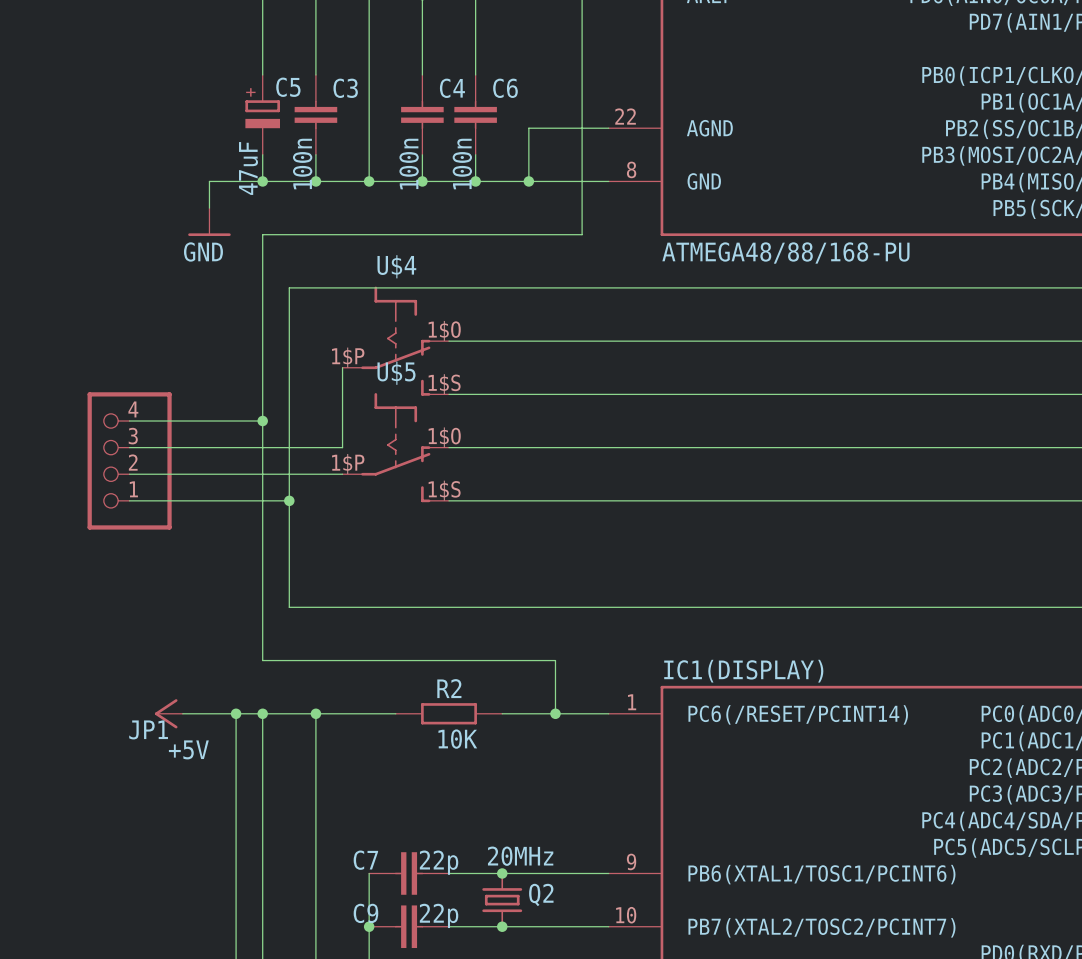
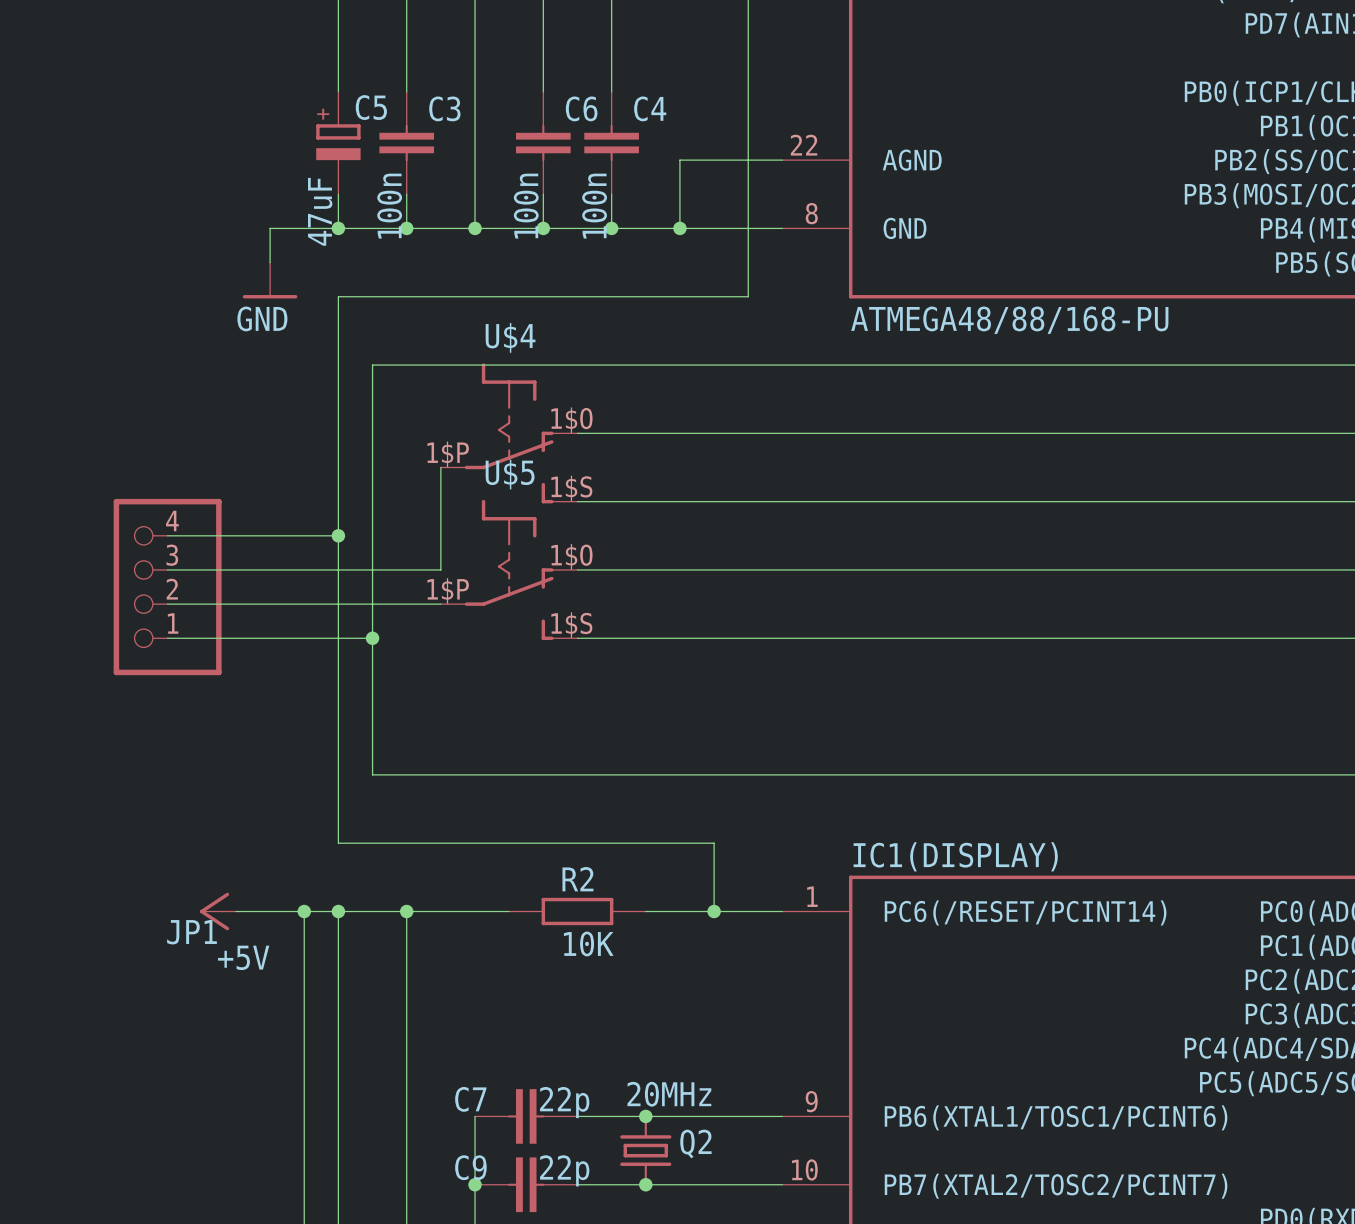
C4 name: C4 (452, 88) -> C6 (581, 108)
C6 name: C6 (505, 88) -> C4 (650, 108)

